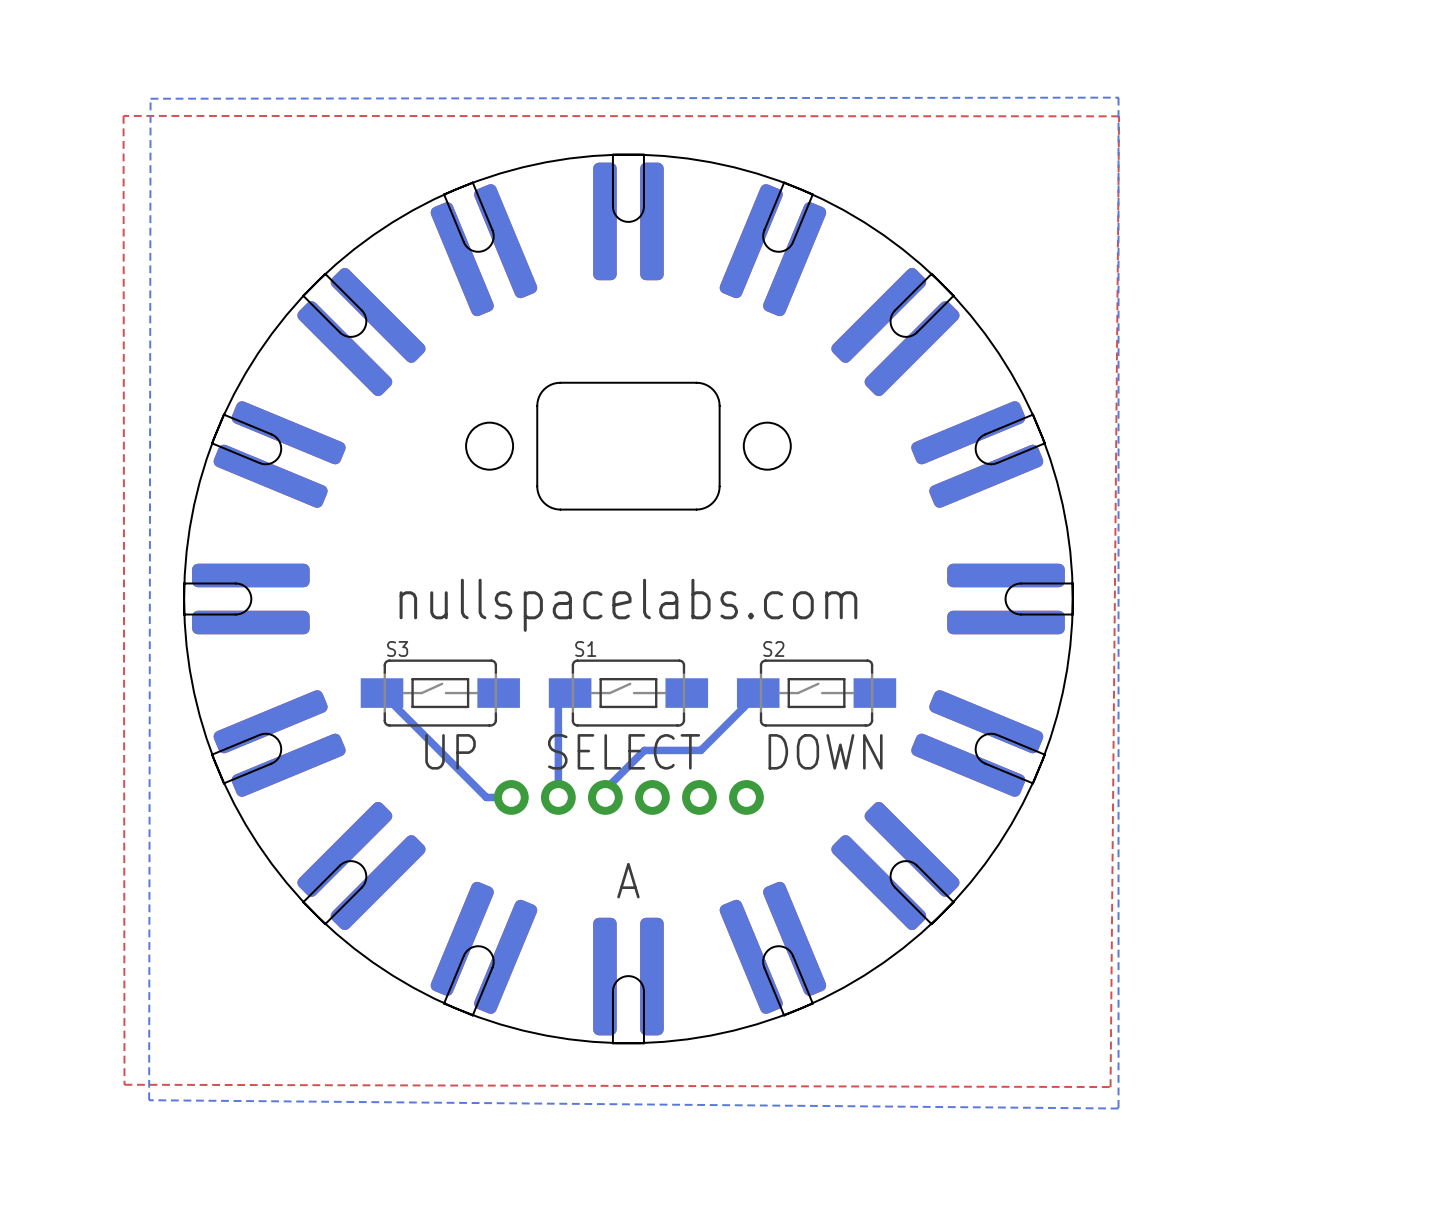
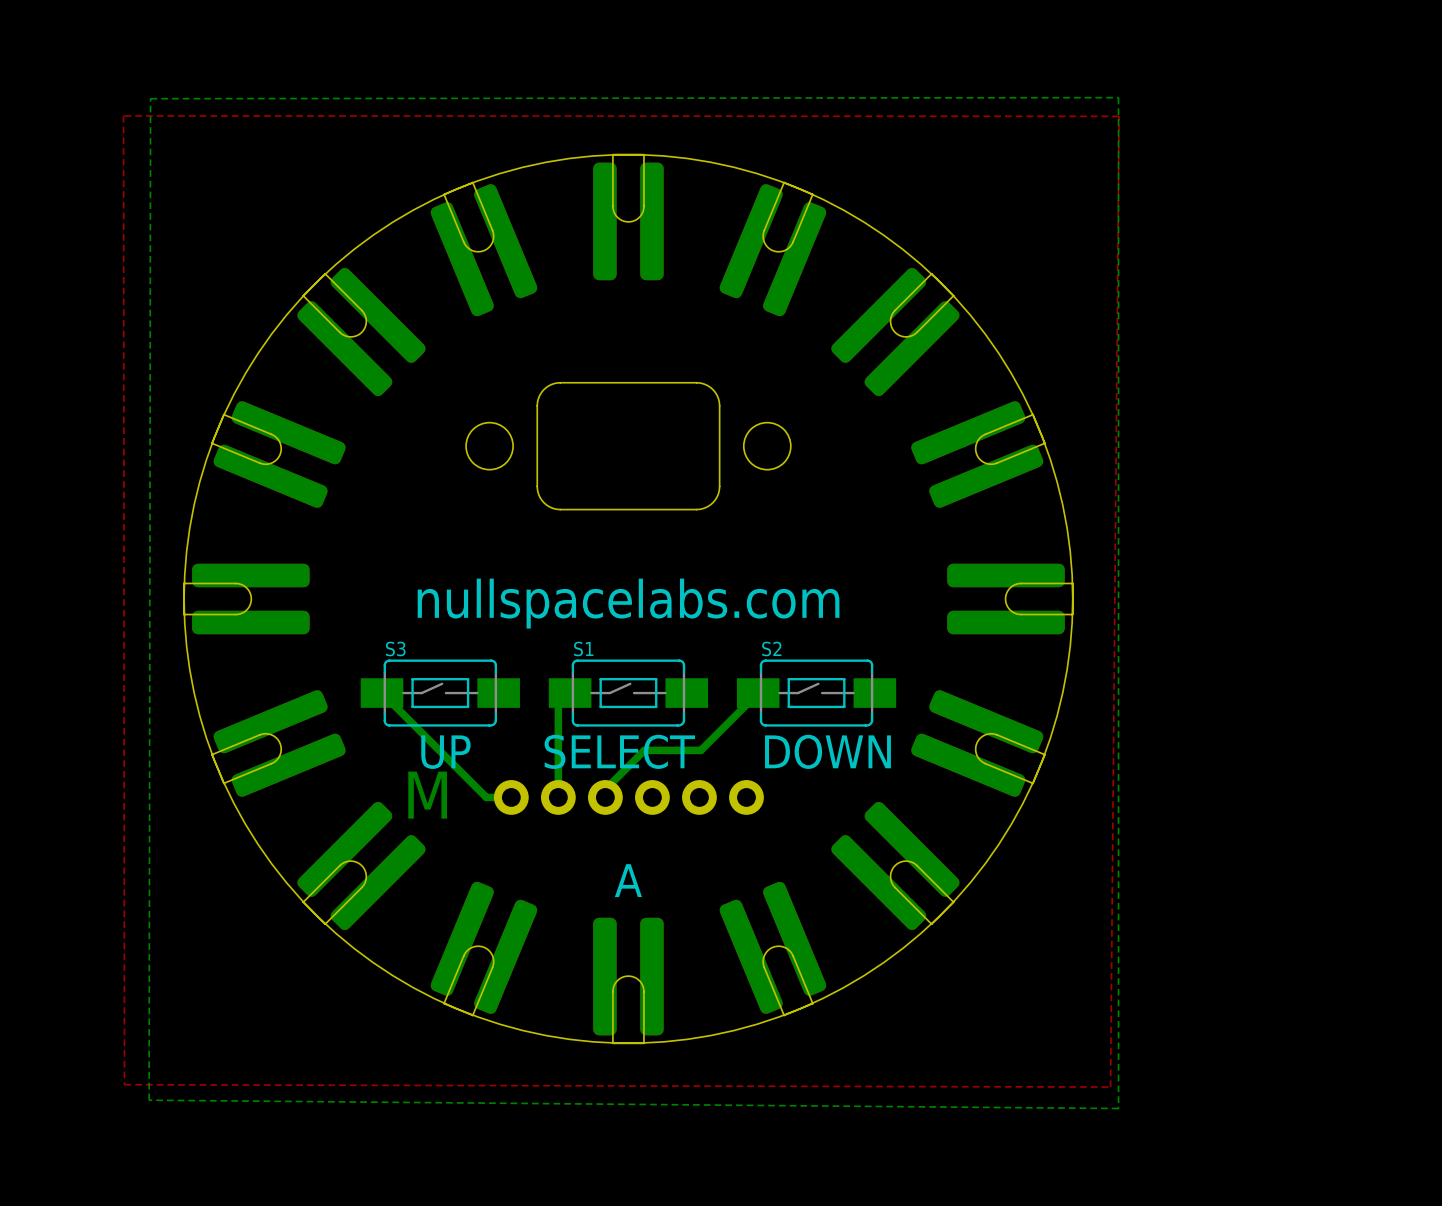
text: none -> M (427, 795)

